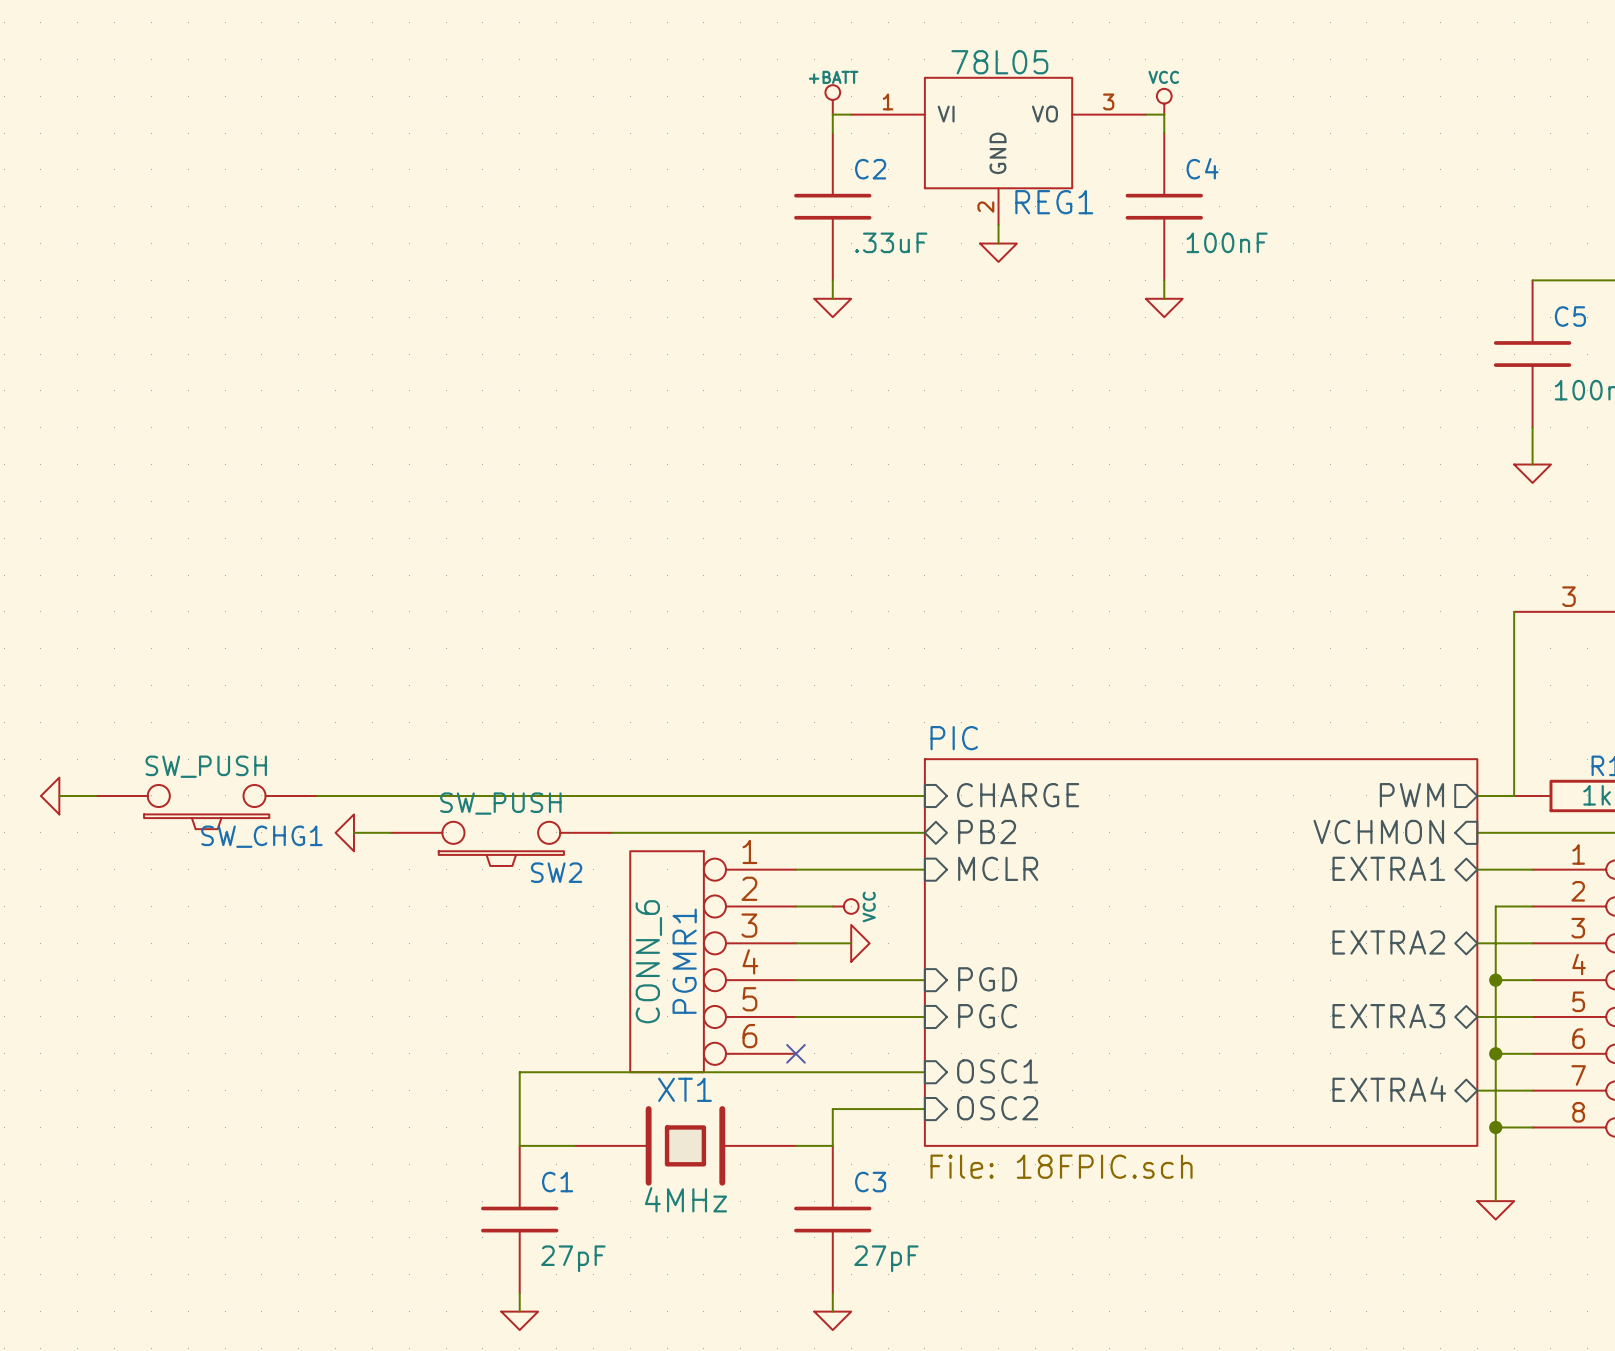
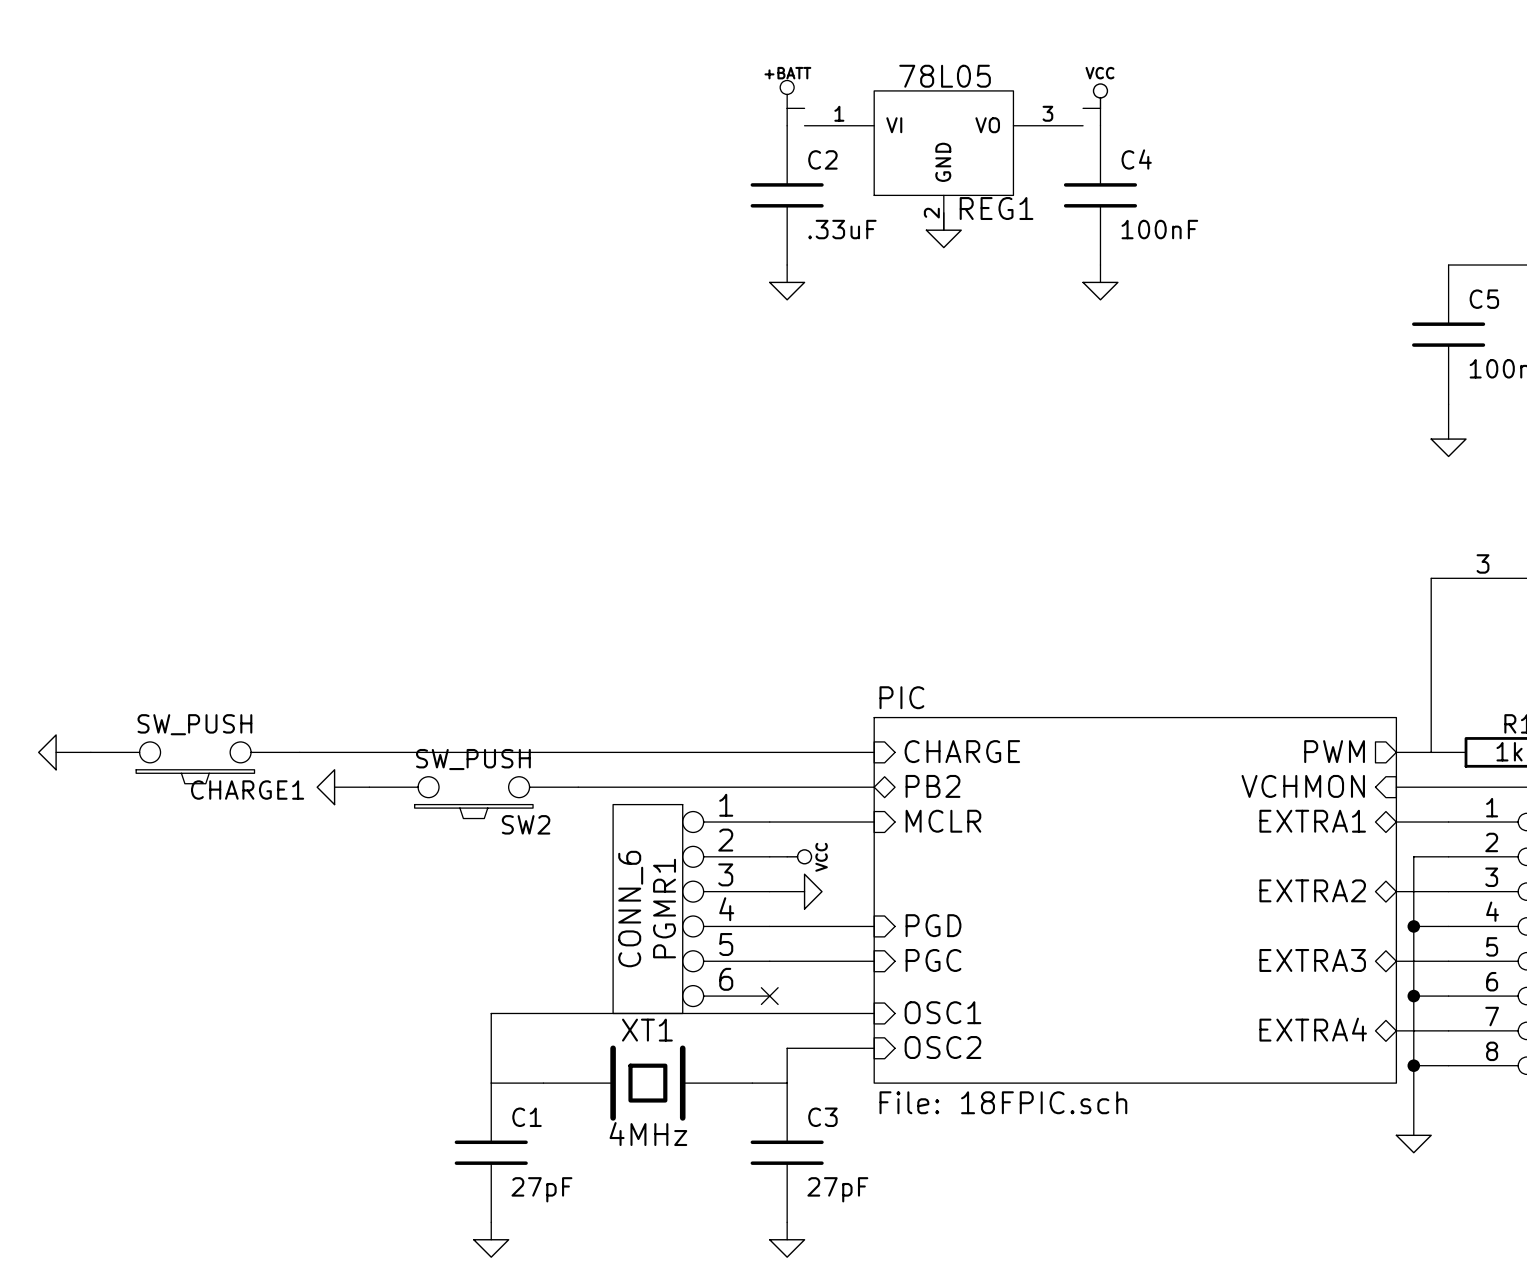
REG1 position: (998, 151) -> (943, 160)
SW_CHG1 name: SW_CHG1 (261, 836) -> CHARGE1 (247, 790)
PGMR1 position: (713, 961) -> (691, 909)
no-connect mark position: (795, 1053) -> (769, 996)

